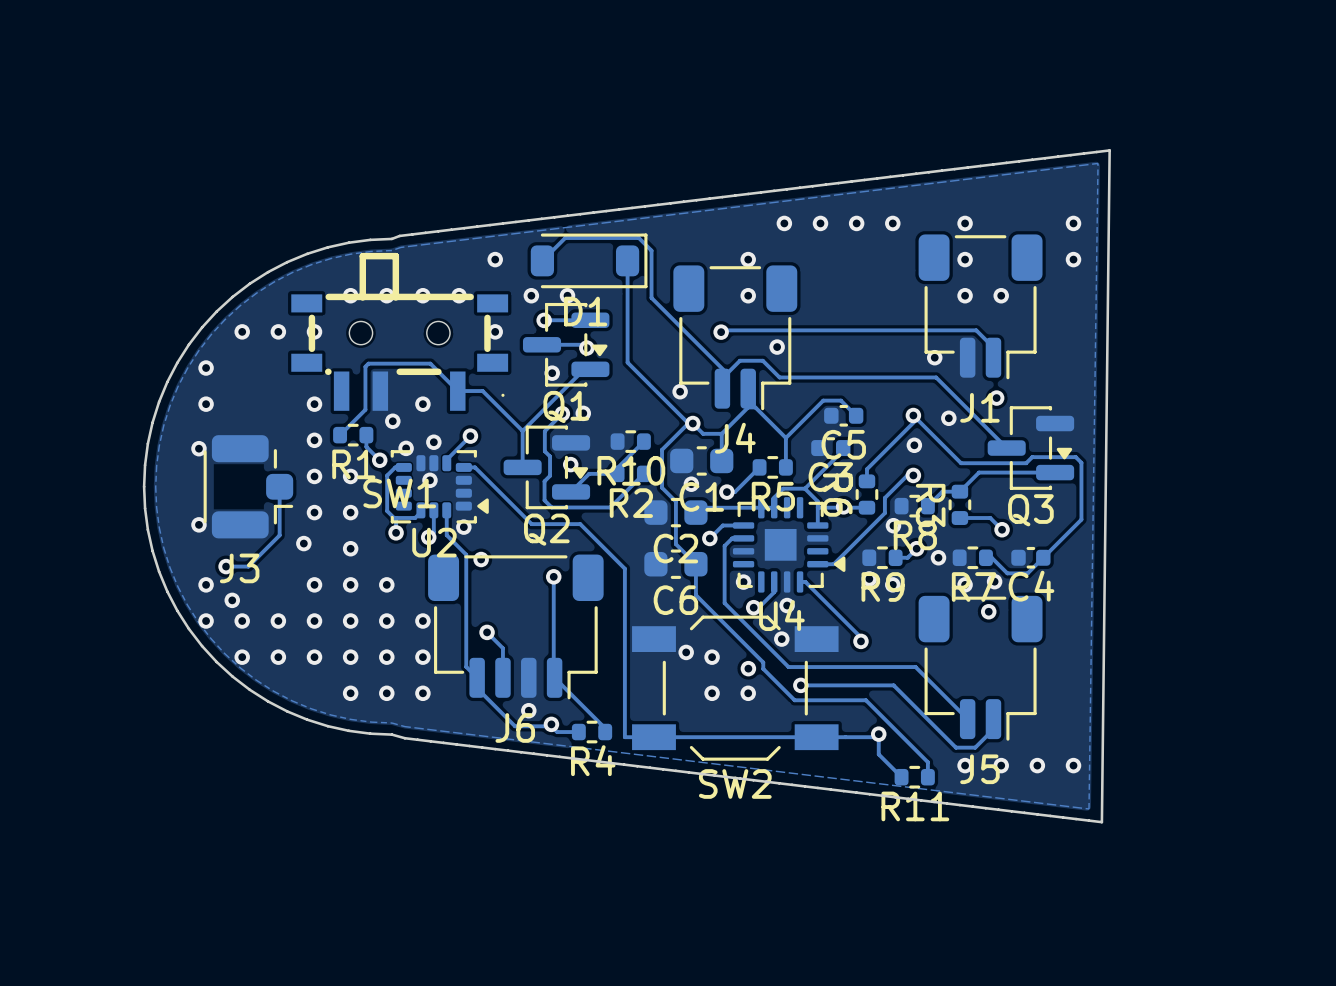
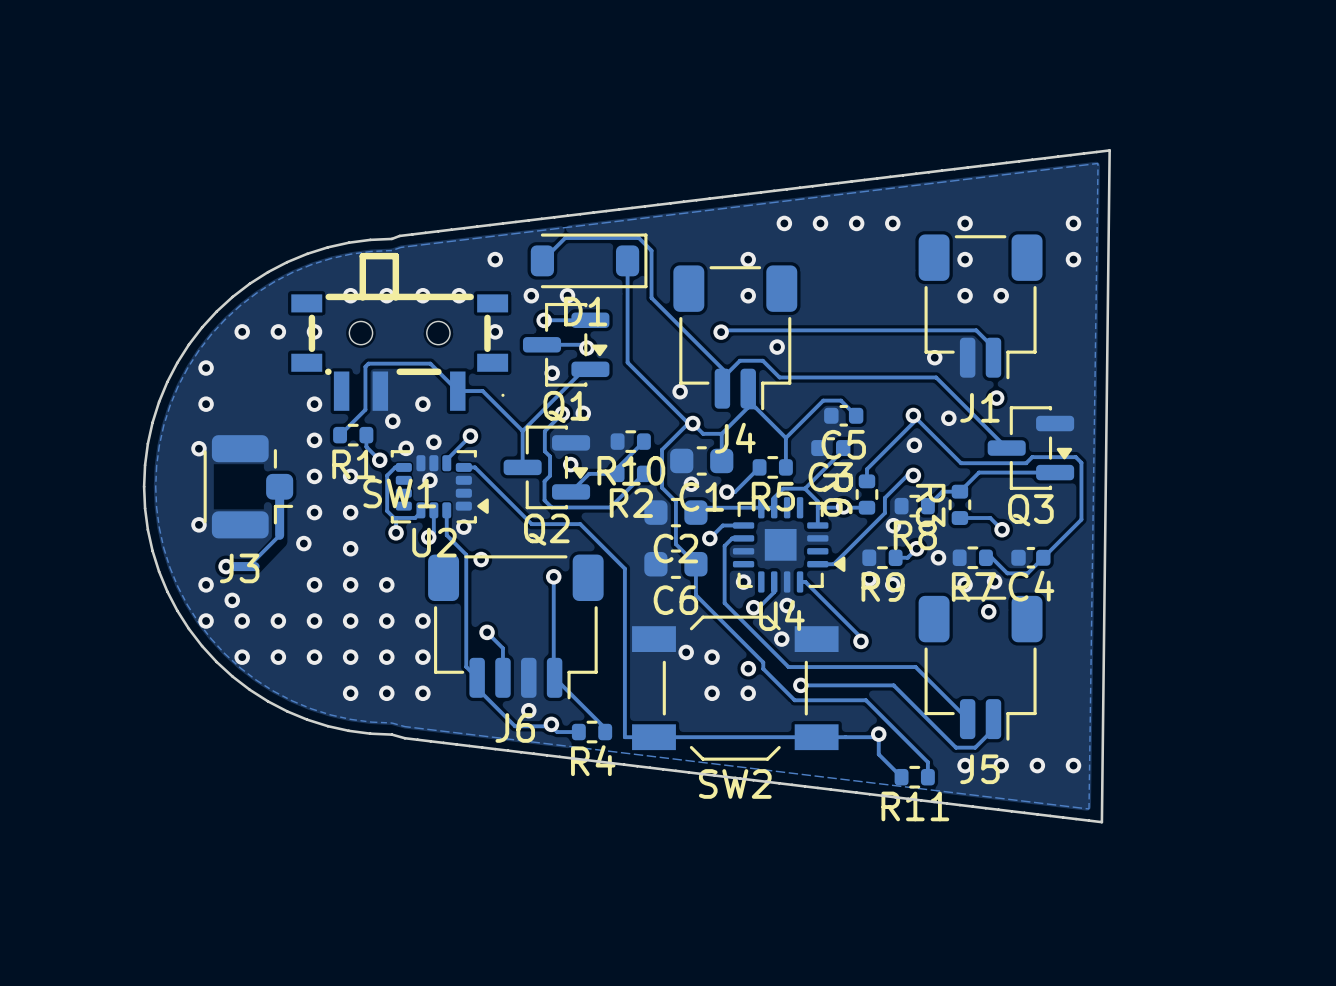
track width: thin (279, 486) (279, 535) -> thick (279, 486) (279, 535)
track width: thin (248, 566) (226, 566) -> thick (248, 566) (226, 566)

